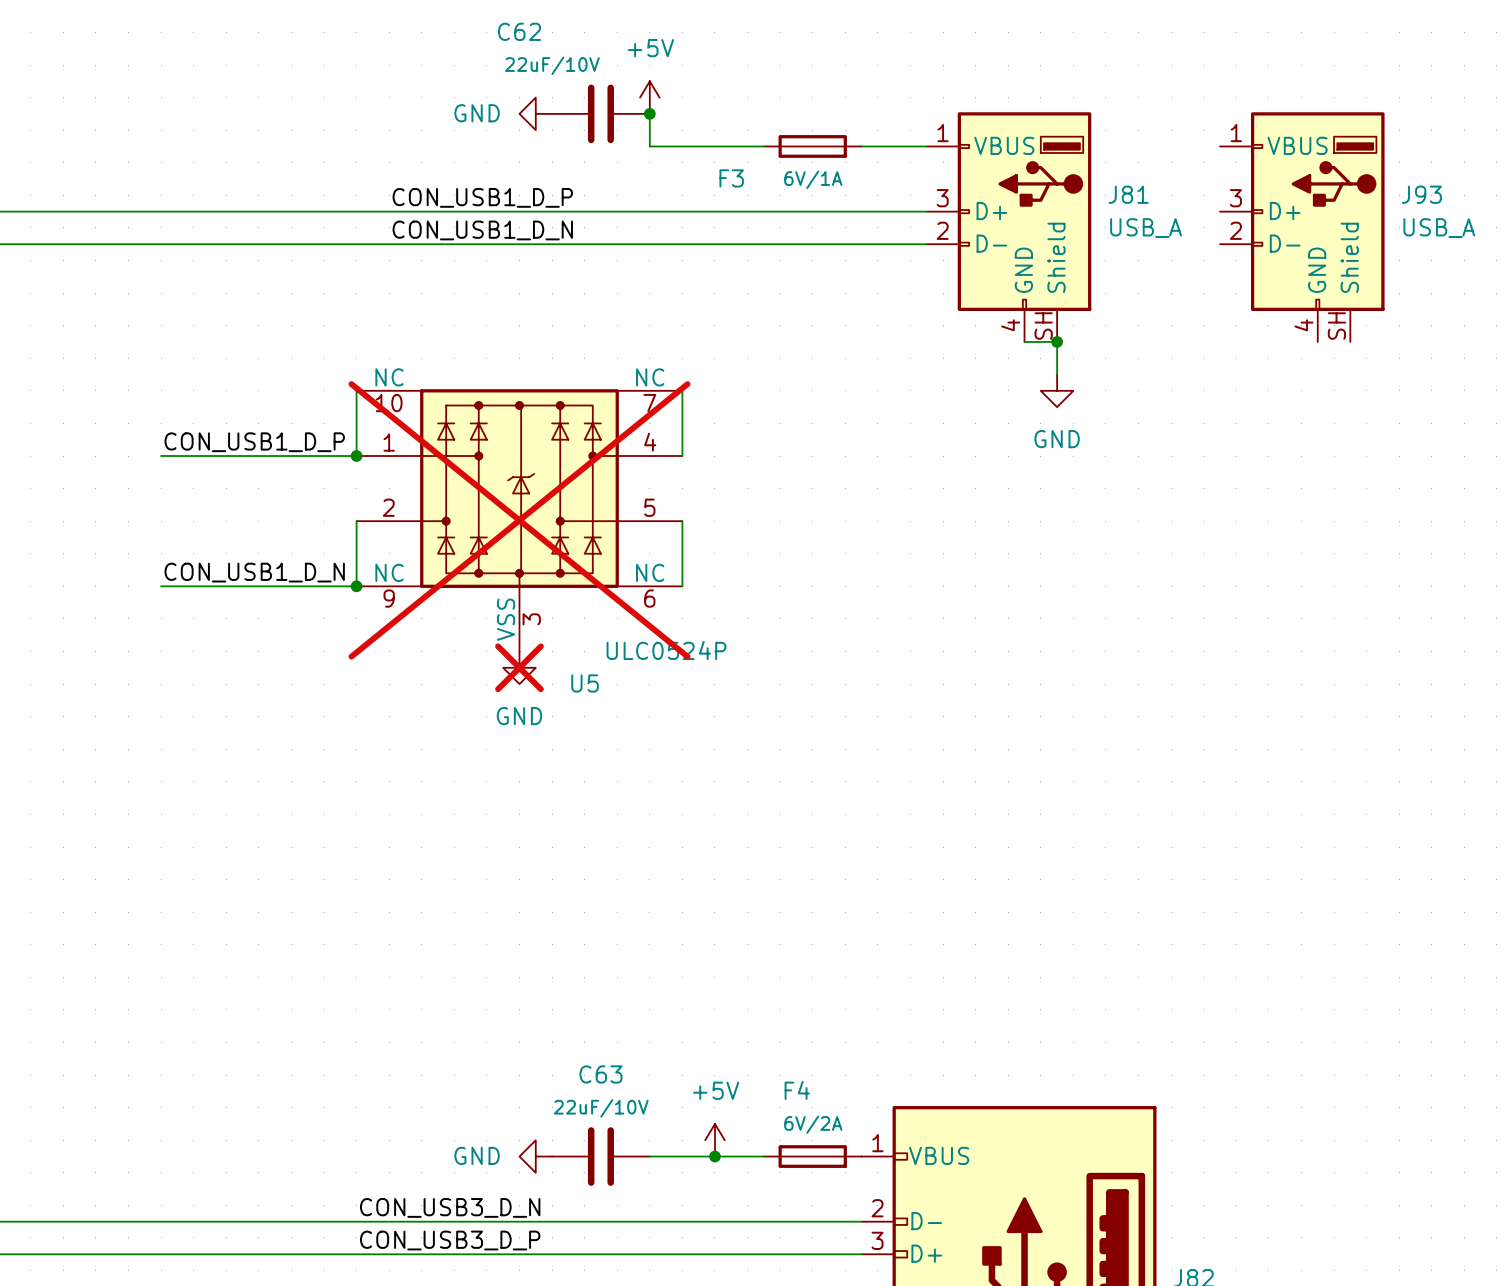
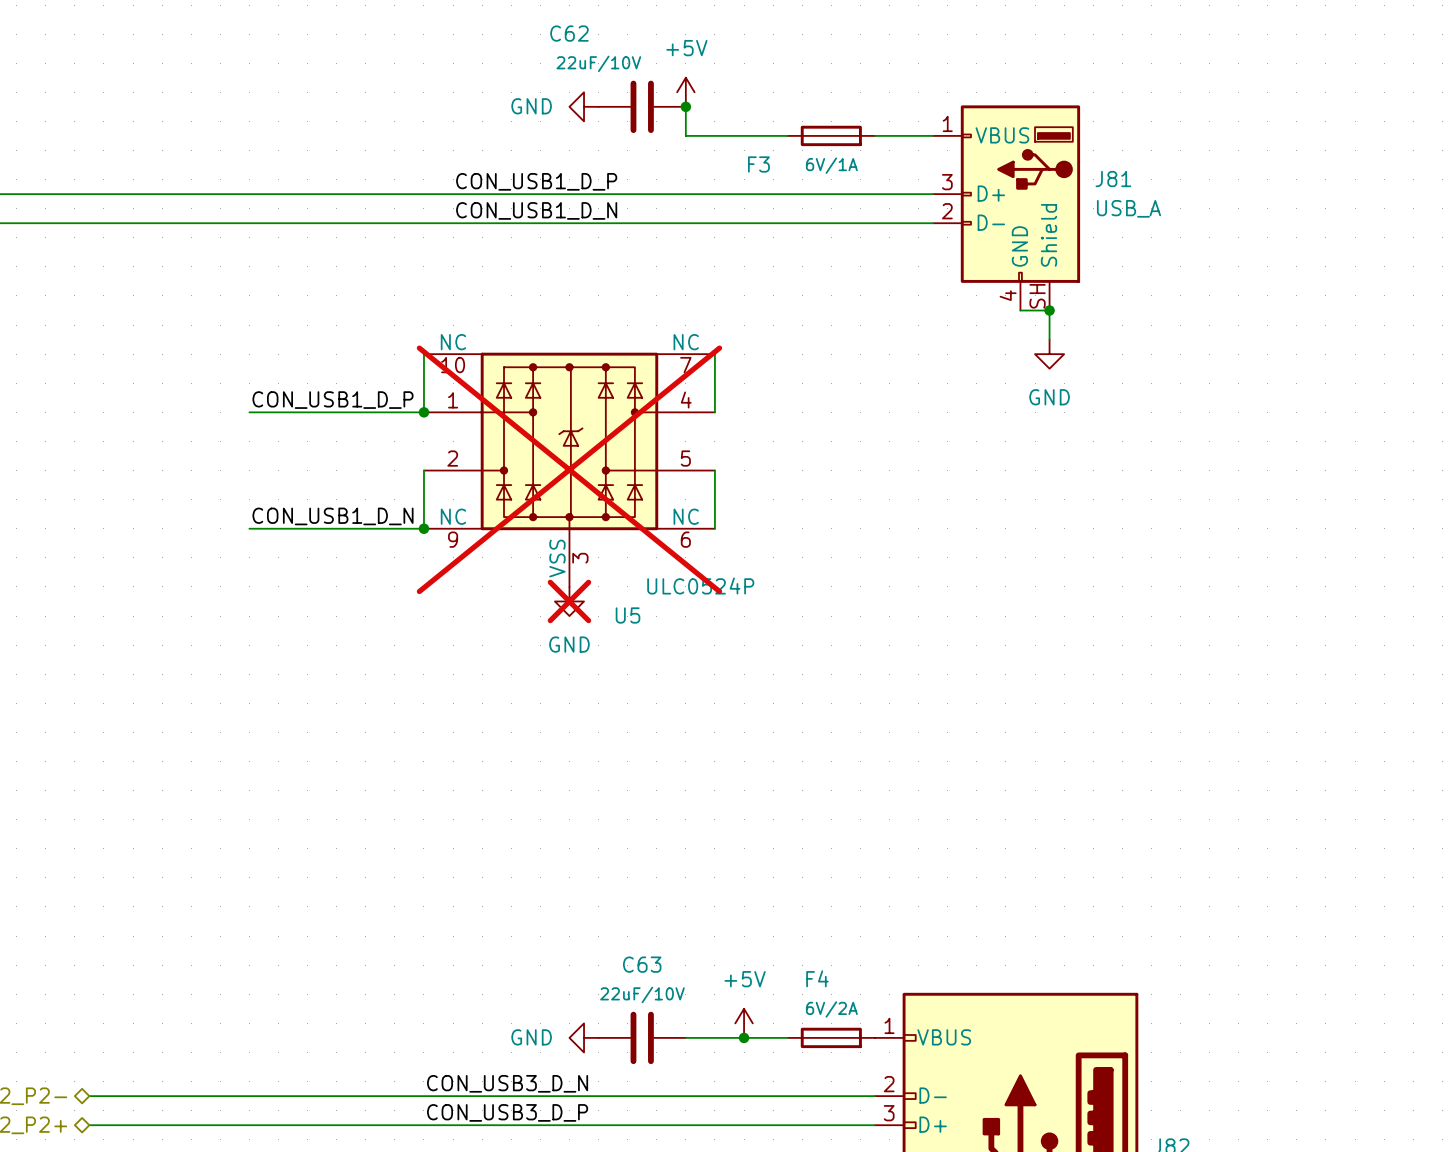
J93: USB_A (1302, 227) -> none

